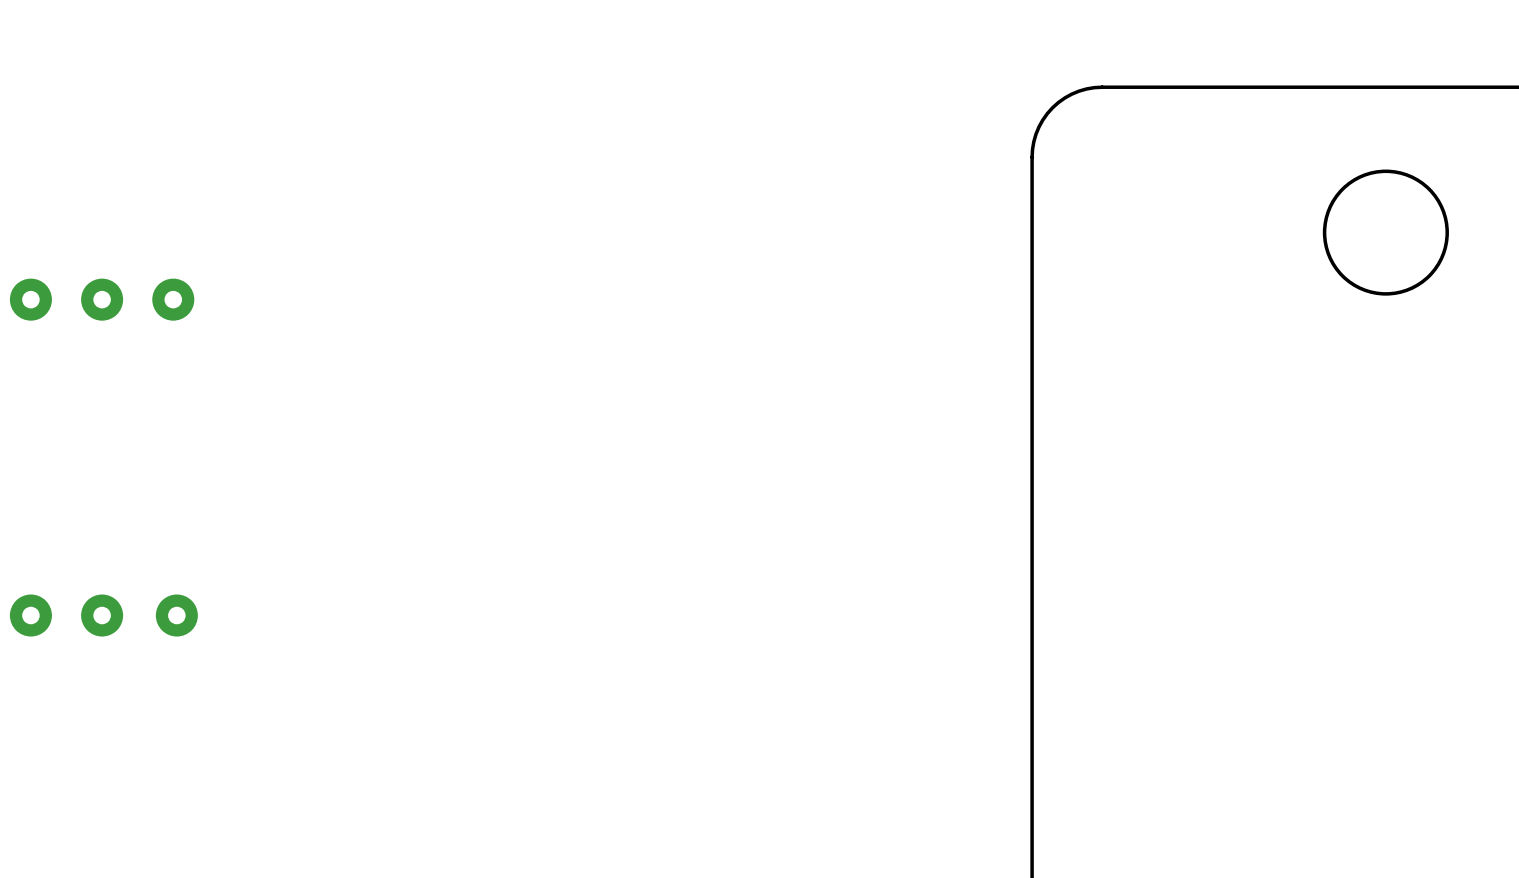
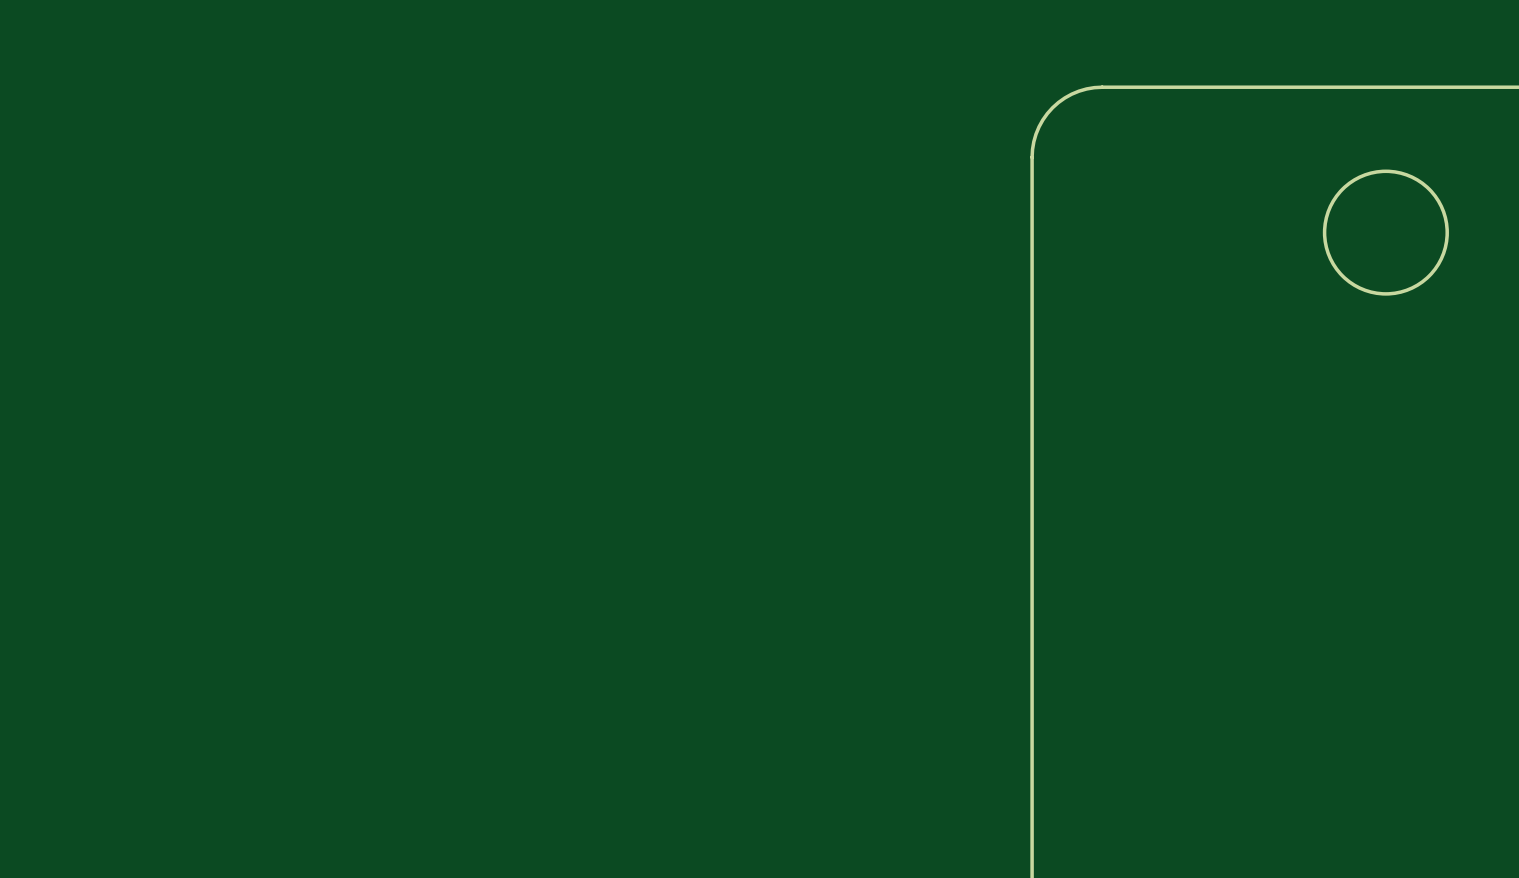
via: (30, 299) -> none
via: (102, 299) -> none
via: (173, 299) -> none
via: (30, 615) -> none
via: (102, 615) -> none
via: (176, 615) -> none

